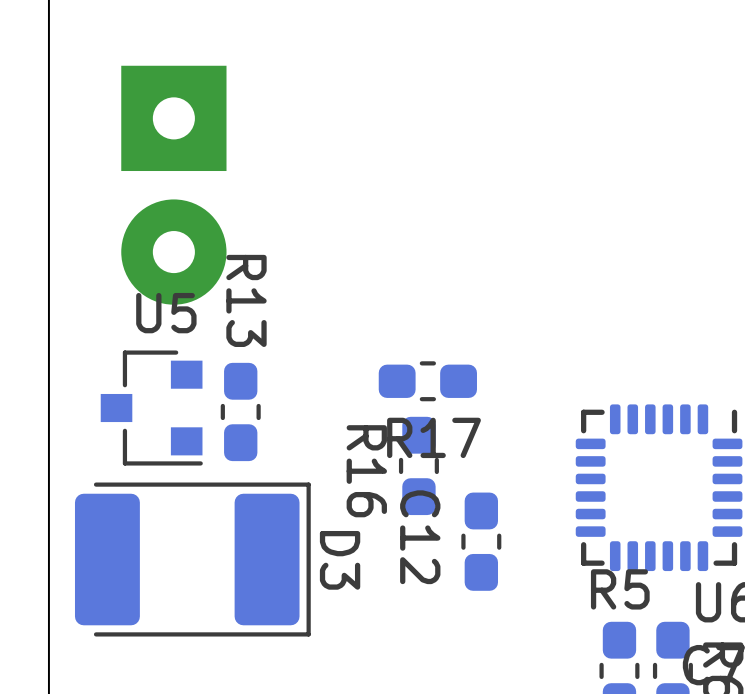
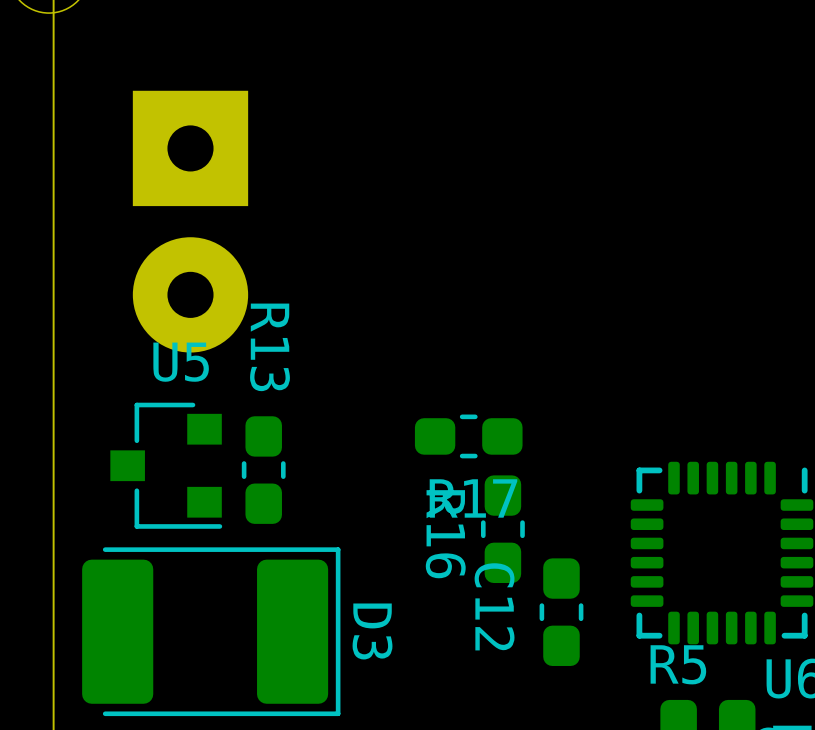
R16 position: (418, 465) -> (502, 529)
C12 position: (481, 541) -> (561, 612)

